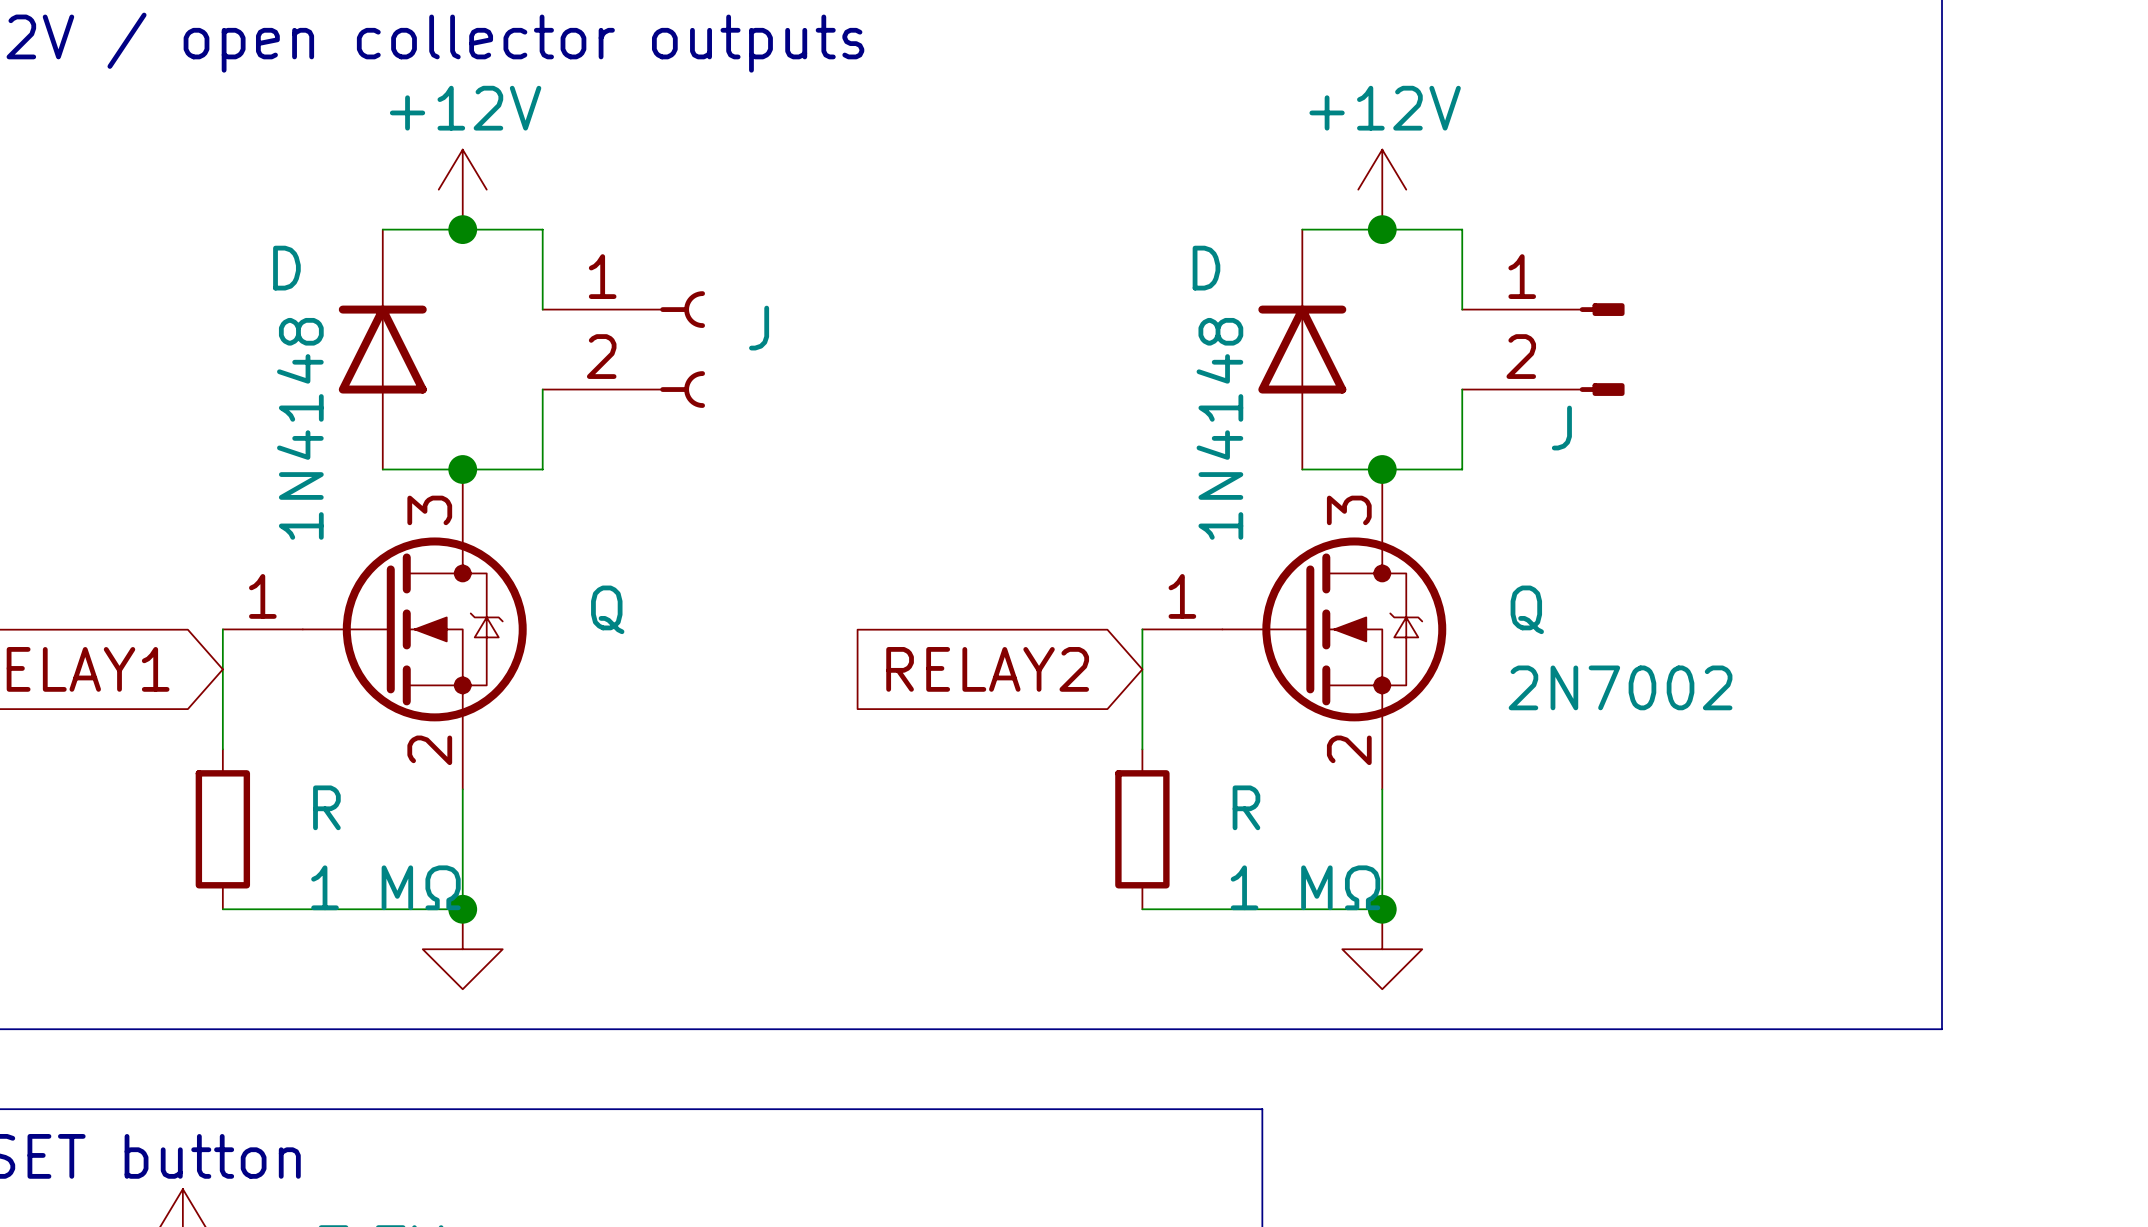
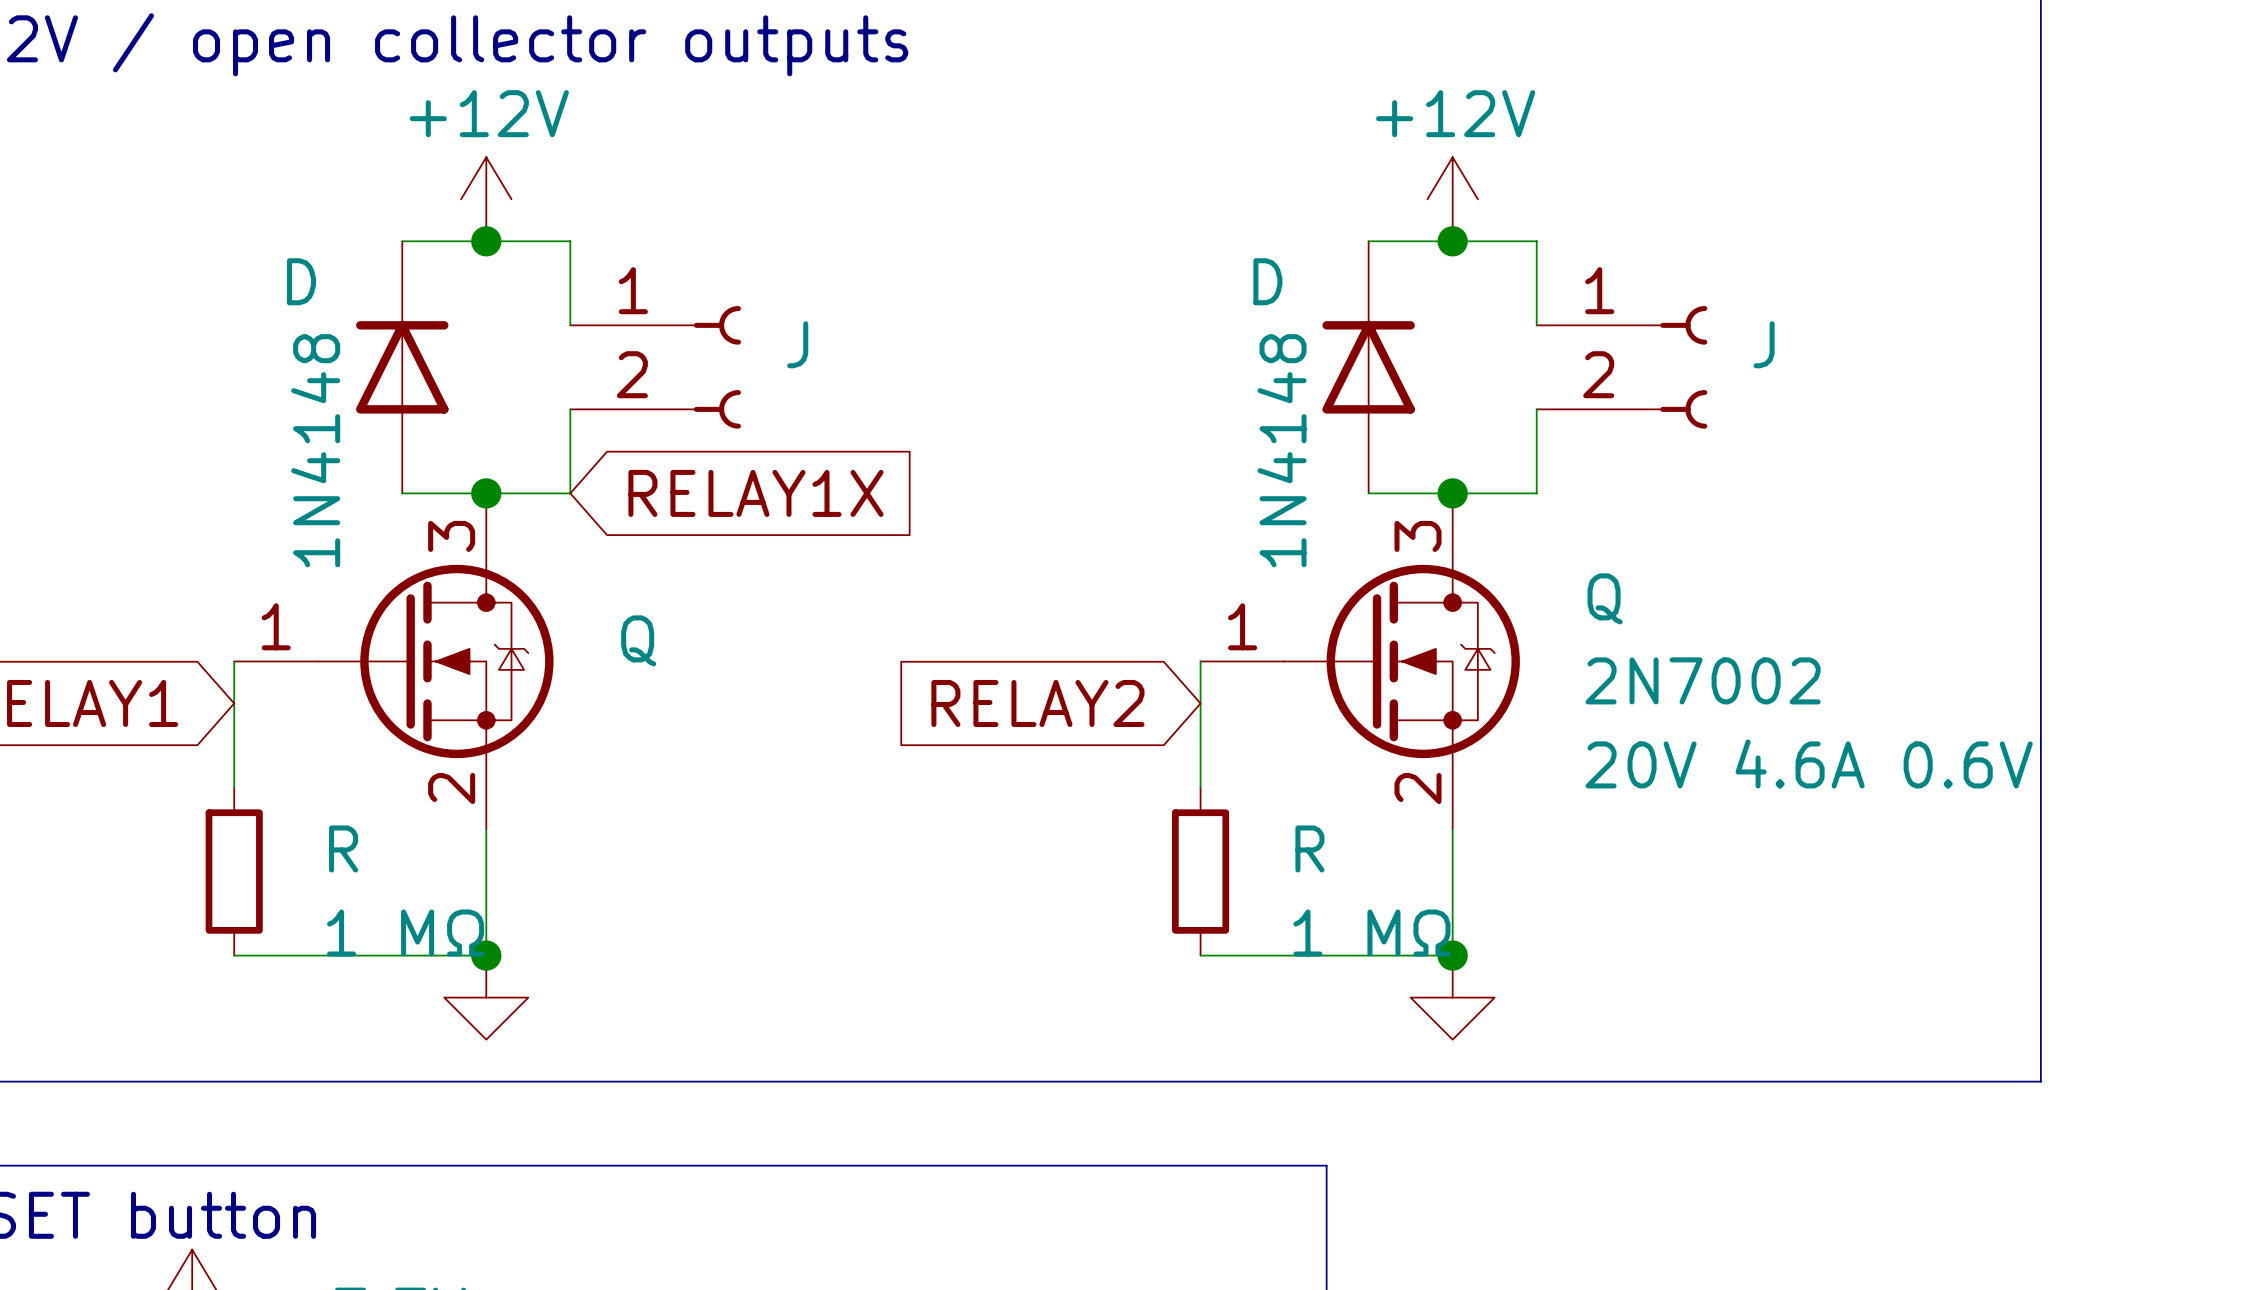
J symbol: [1462, 303, 1625, 396] -> [1536, 306, 1708, 429]
J name position: J (1561, 428) -> J (1764, 344)
global label: none -> RELAY1X (755, 493)
Q name position: Q (1527, 609) -> Q (1605, 598)
Q value position: 2N7002 (1620, 687) -> 2N7002 (1703, 680)
Q text: none -> 20V 4.6A 0.6V (1809, 763)

